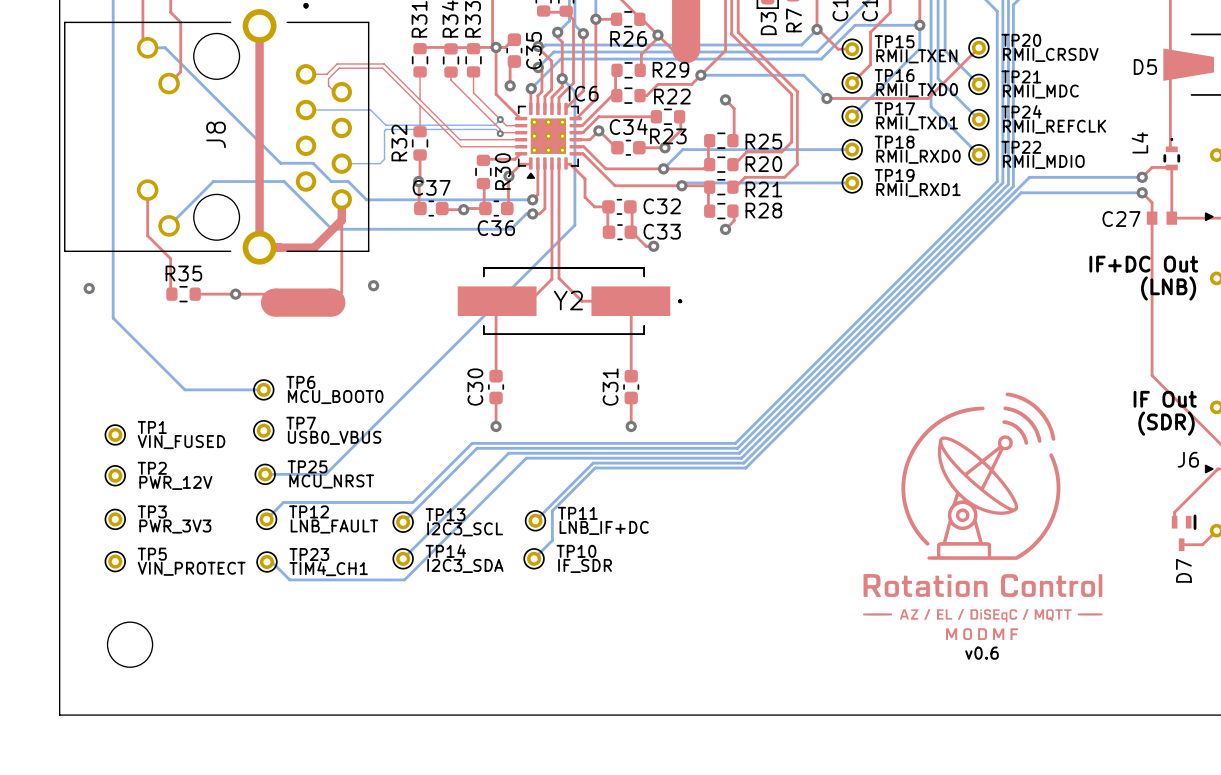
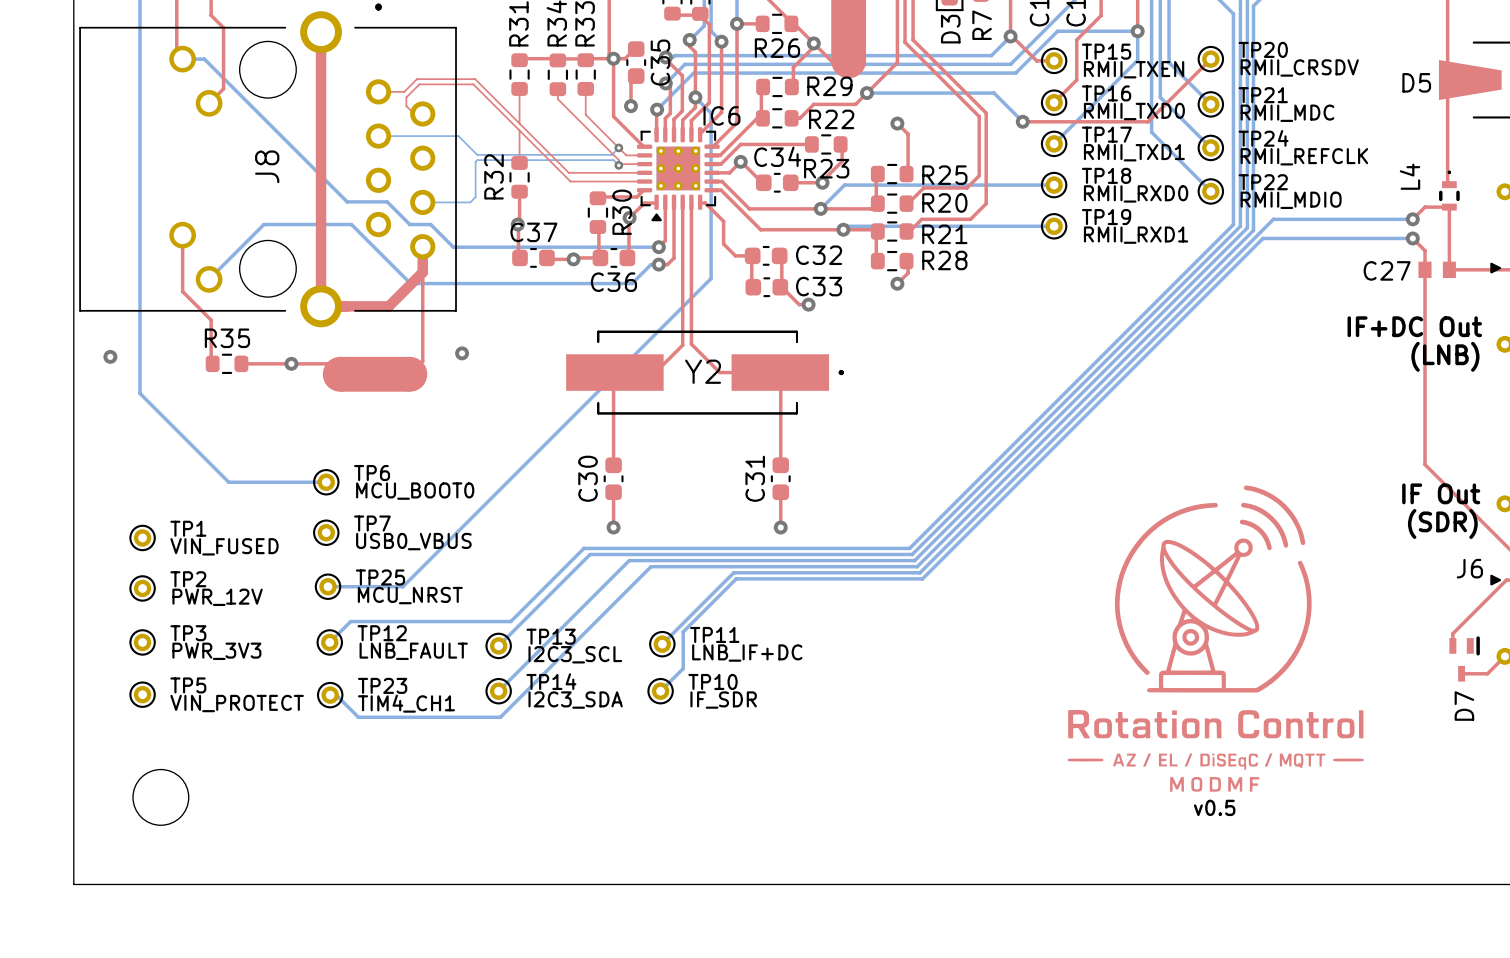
text: v0.6 (982, 653) -> v0.5 (1214, 807)

